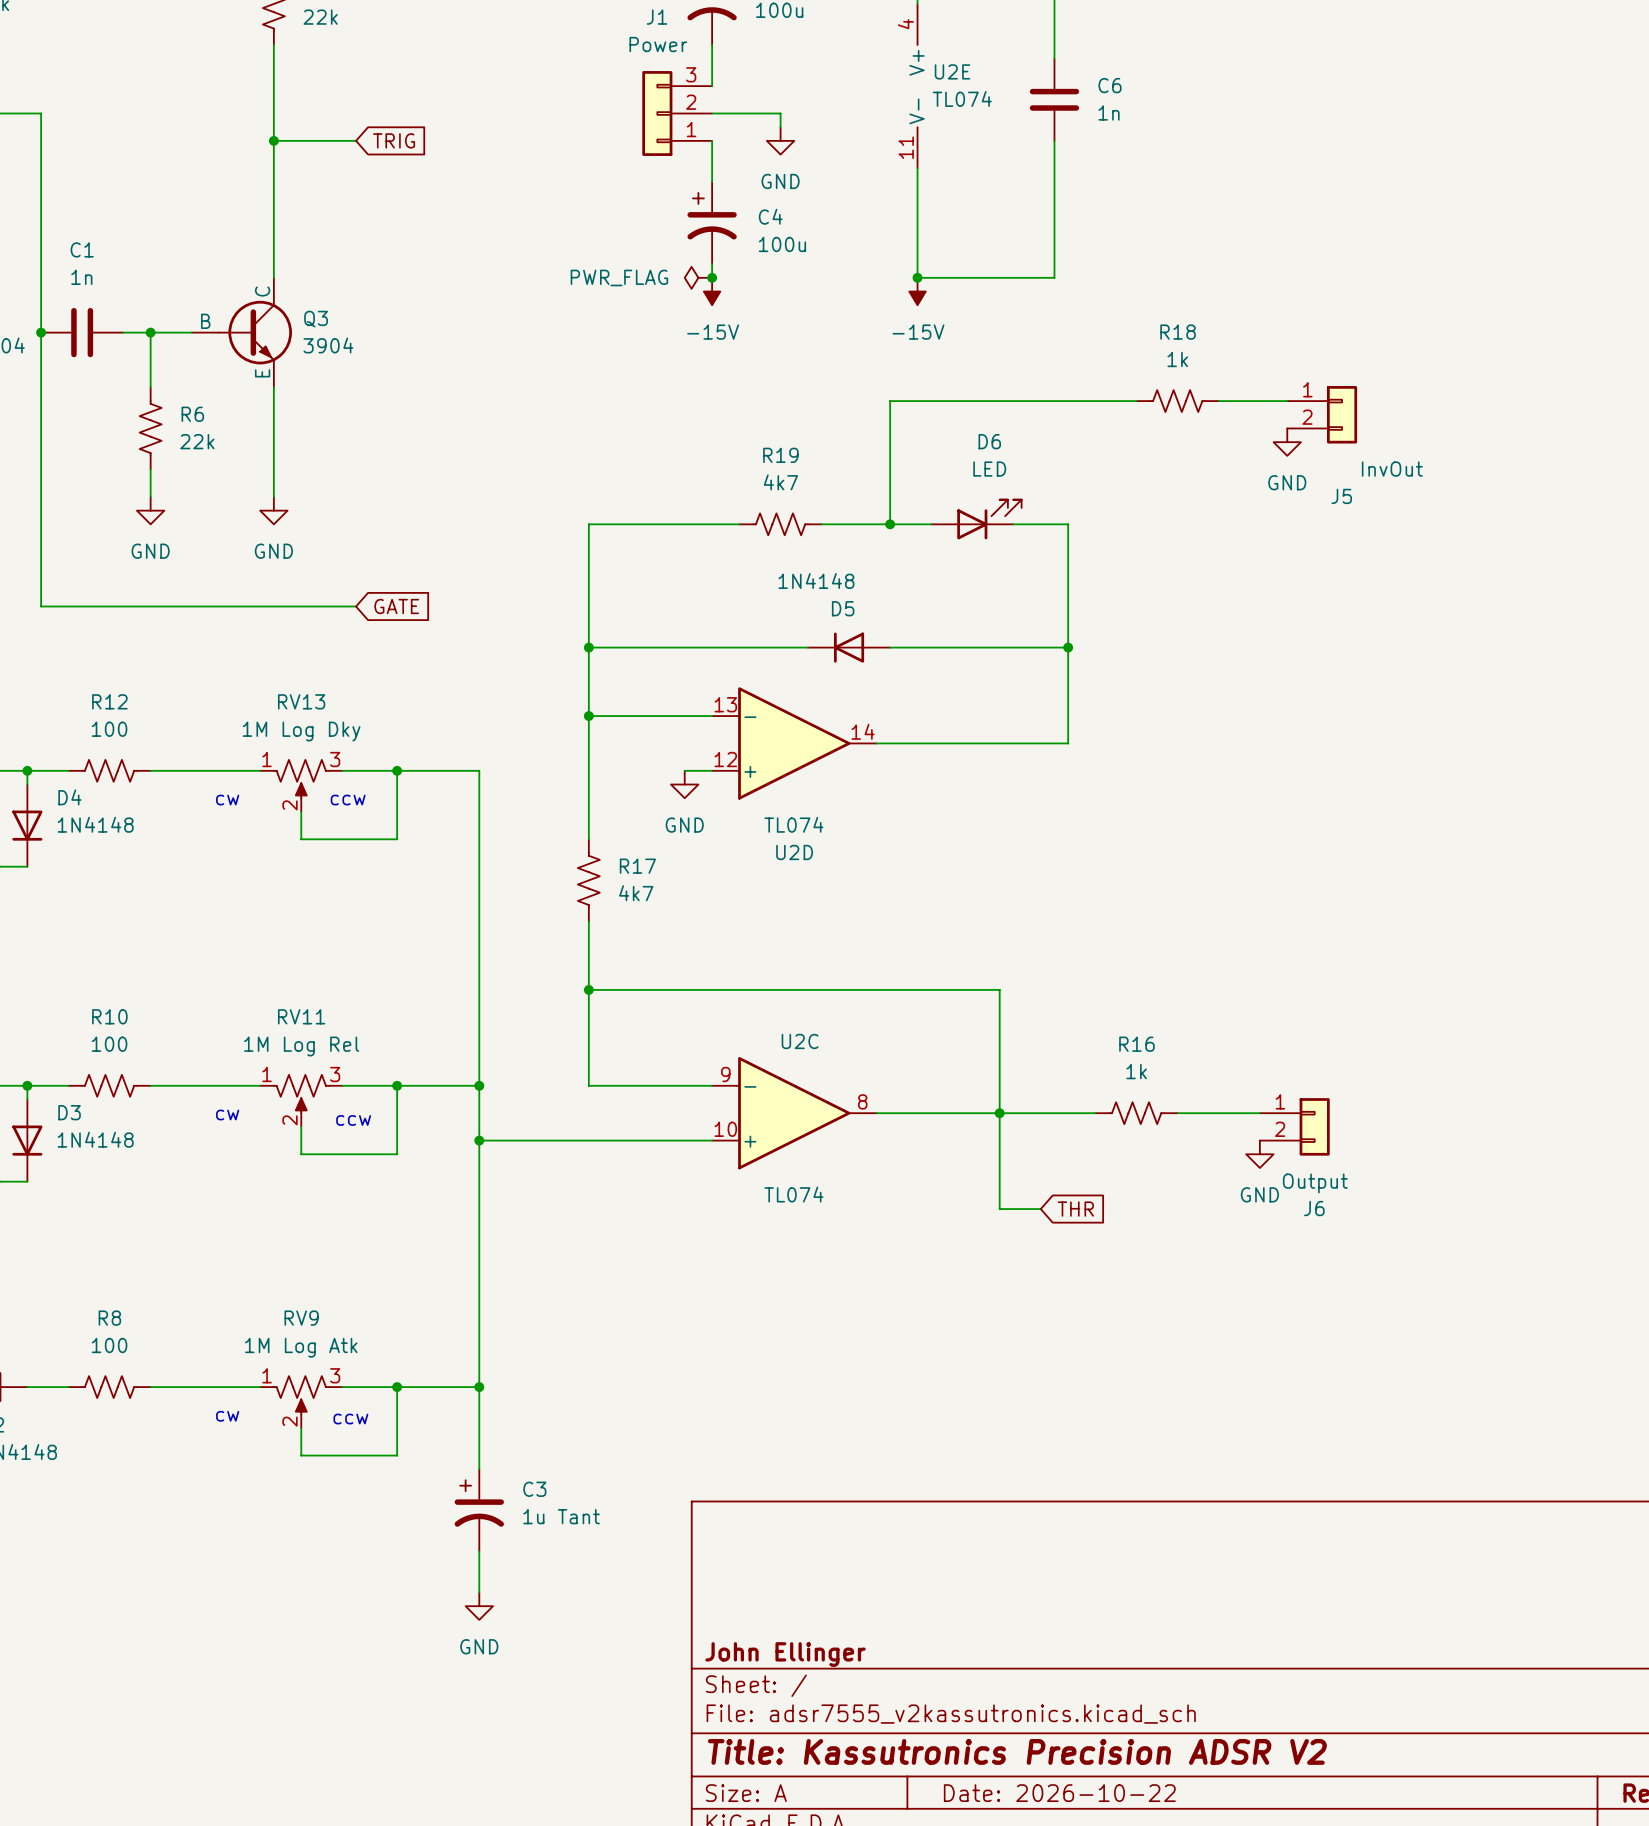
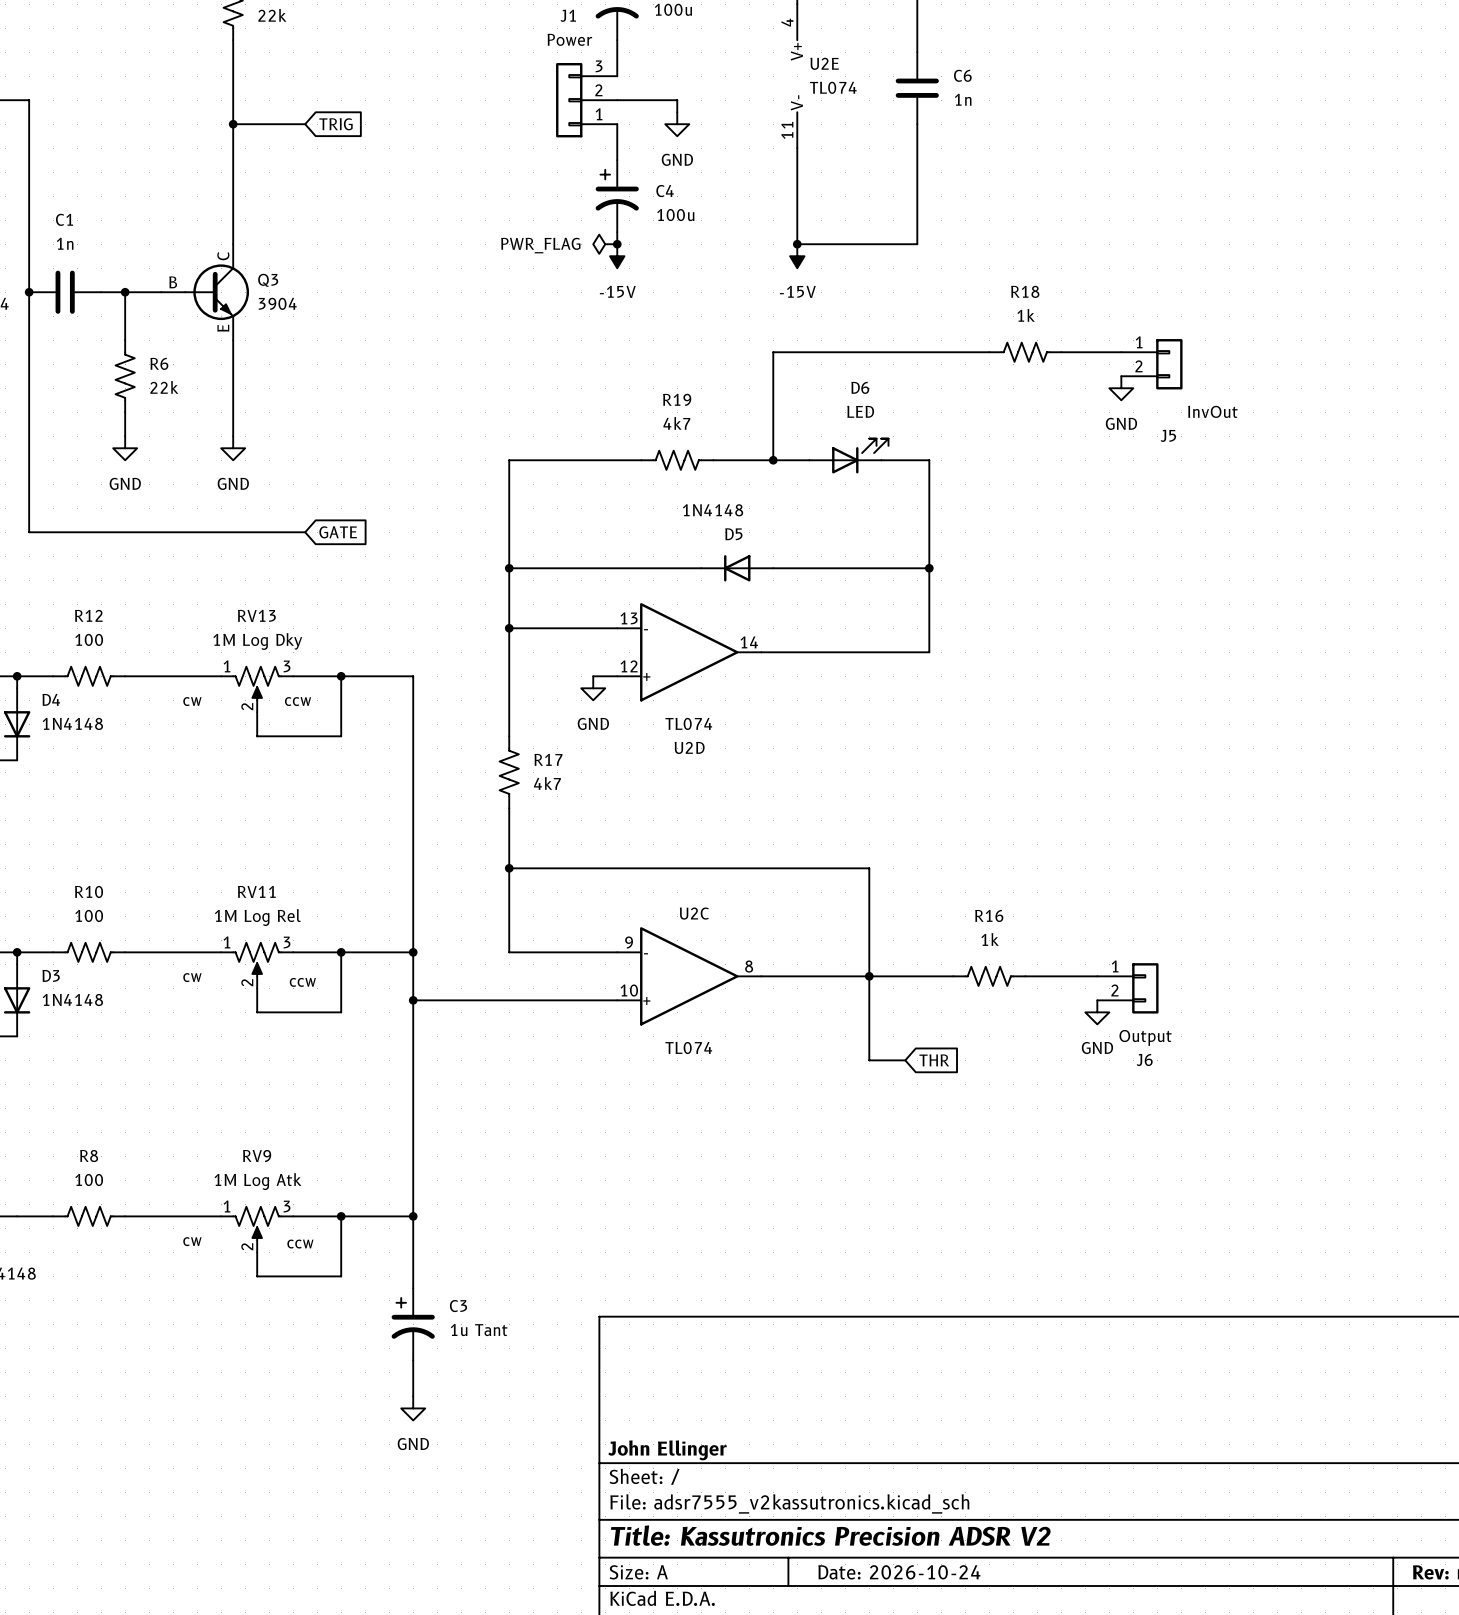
title block: Date: 2026-10-22 (1059, 1793) -> Date: 2026-10-24 (899, 1572)

